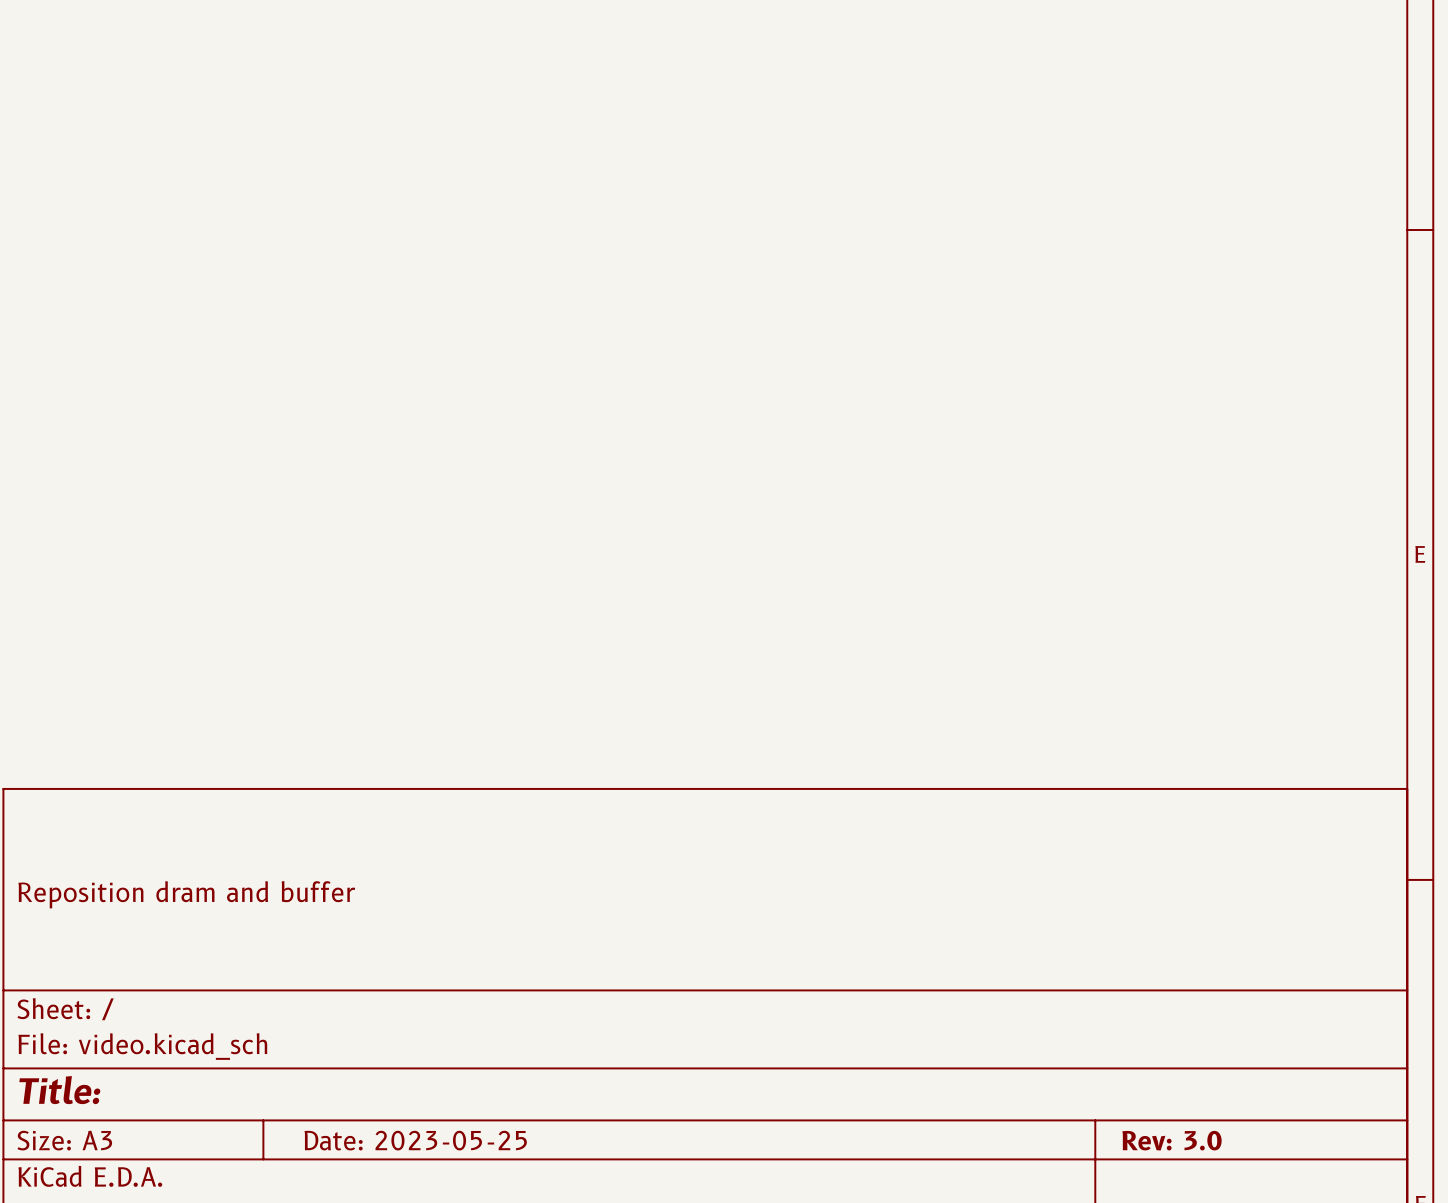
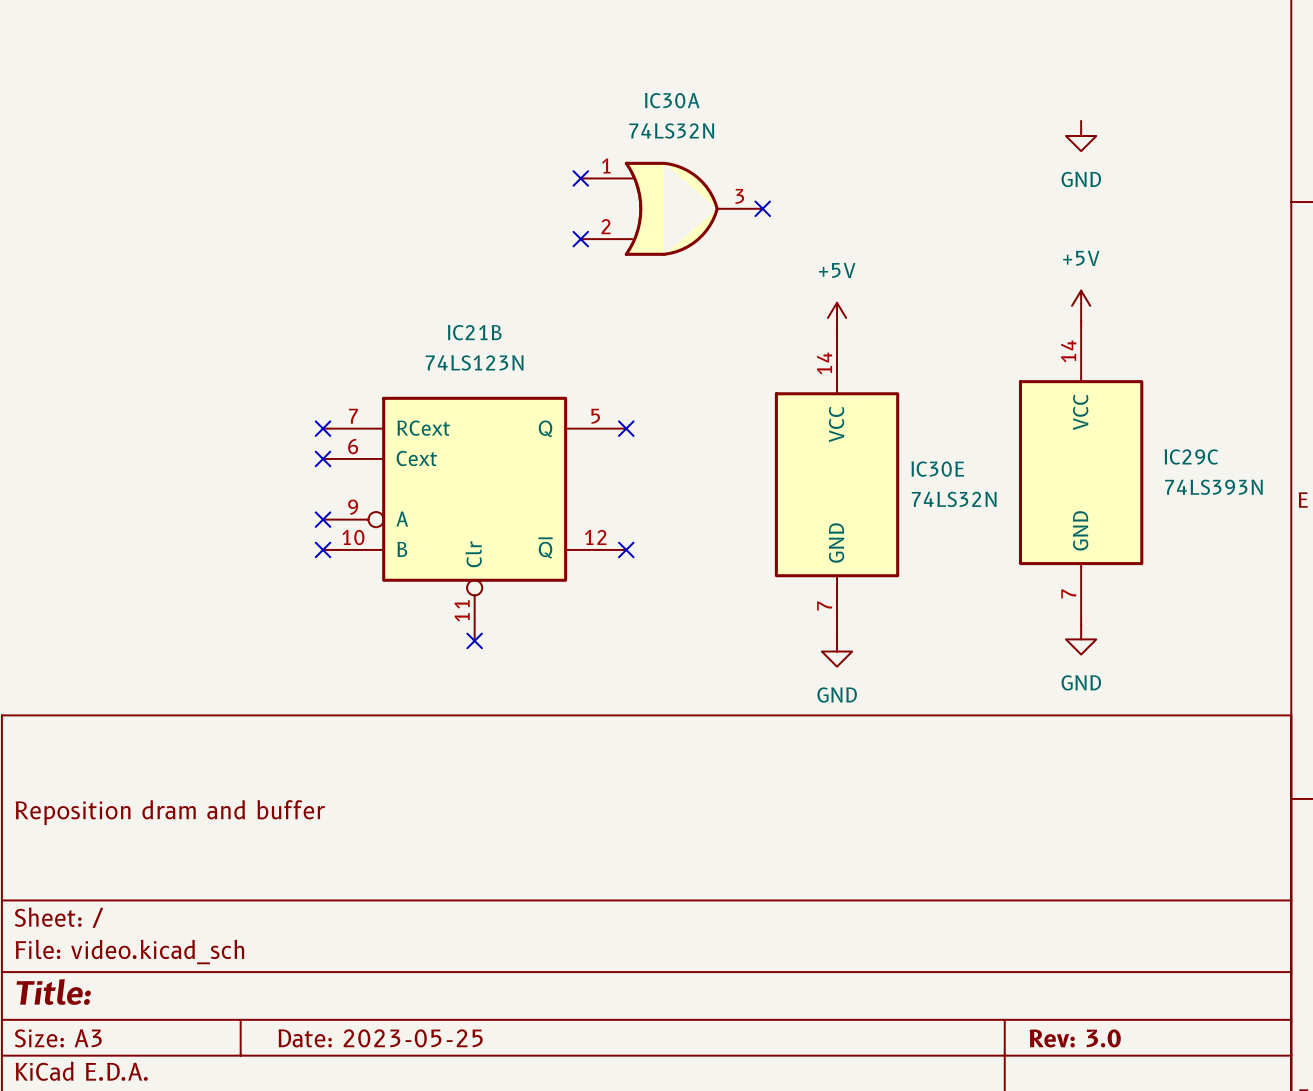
power symbol: none -> GND (1081, 136)
no-connect mark: none -> (580, 178)
IC30A: none -> 74LS32N (671, 208)
no-connect mark: none -> (762, 208)
no-connect mark: none -> (580, 239)
power symbol: none -> +5V (1081, 305)
power symbol: none -> +5V (837, 317)
no-connect mark: none -> (323, 428)
no-connect mark: none -> (626, 428)
no-connect mark: none -> (323, 458)
IC29C: none -> 74LS393N (1081, 472)
IC30E: none -> 74LS32N (837, 484)
IC21B: none -> 74LS123N (474, 518)
no-connect mark: none -> (323, 519)
no-connect mark: none -> (323, 549)
no-connect mark: none -> (626, 549)
power symbol: none -> GND (1081, 639)
no-connect mark: none -> (474, 640)
power symbol: none -> GND (837, 651)

